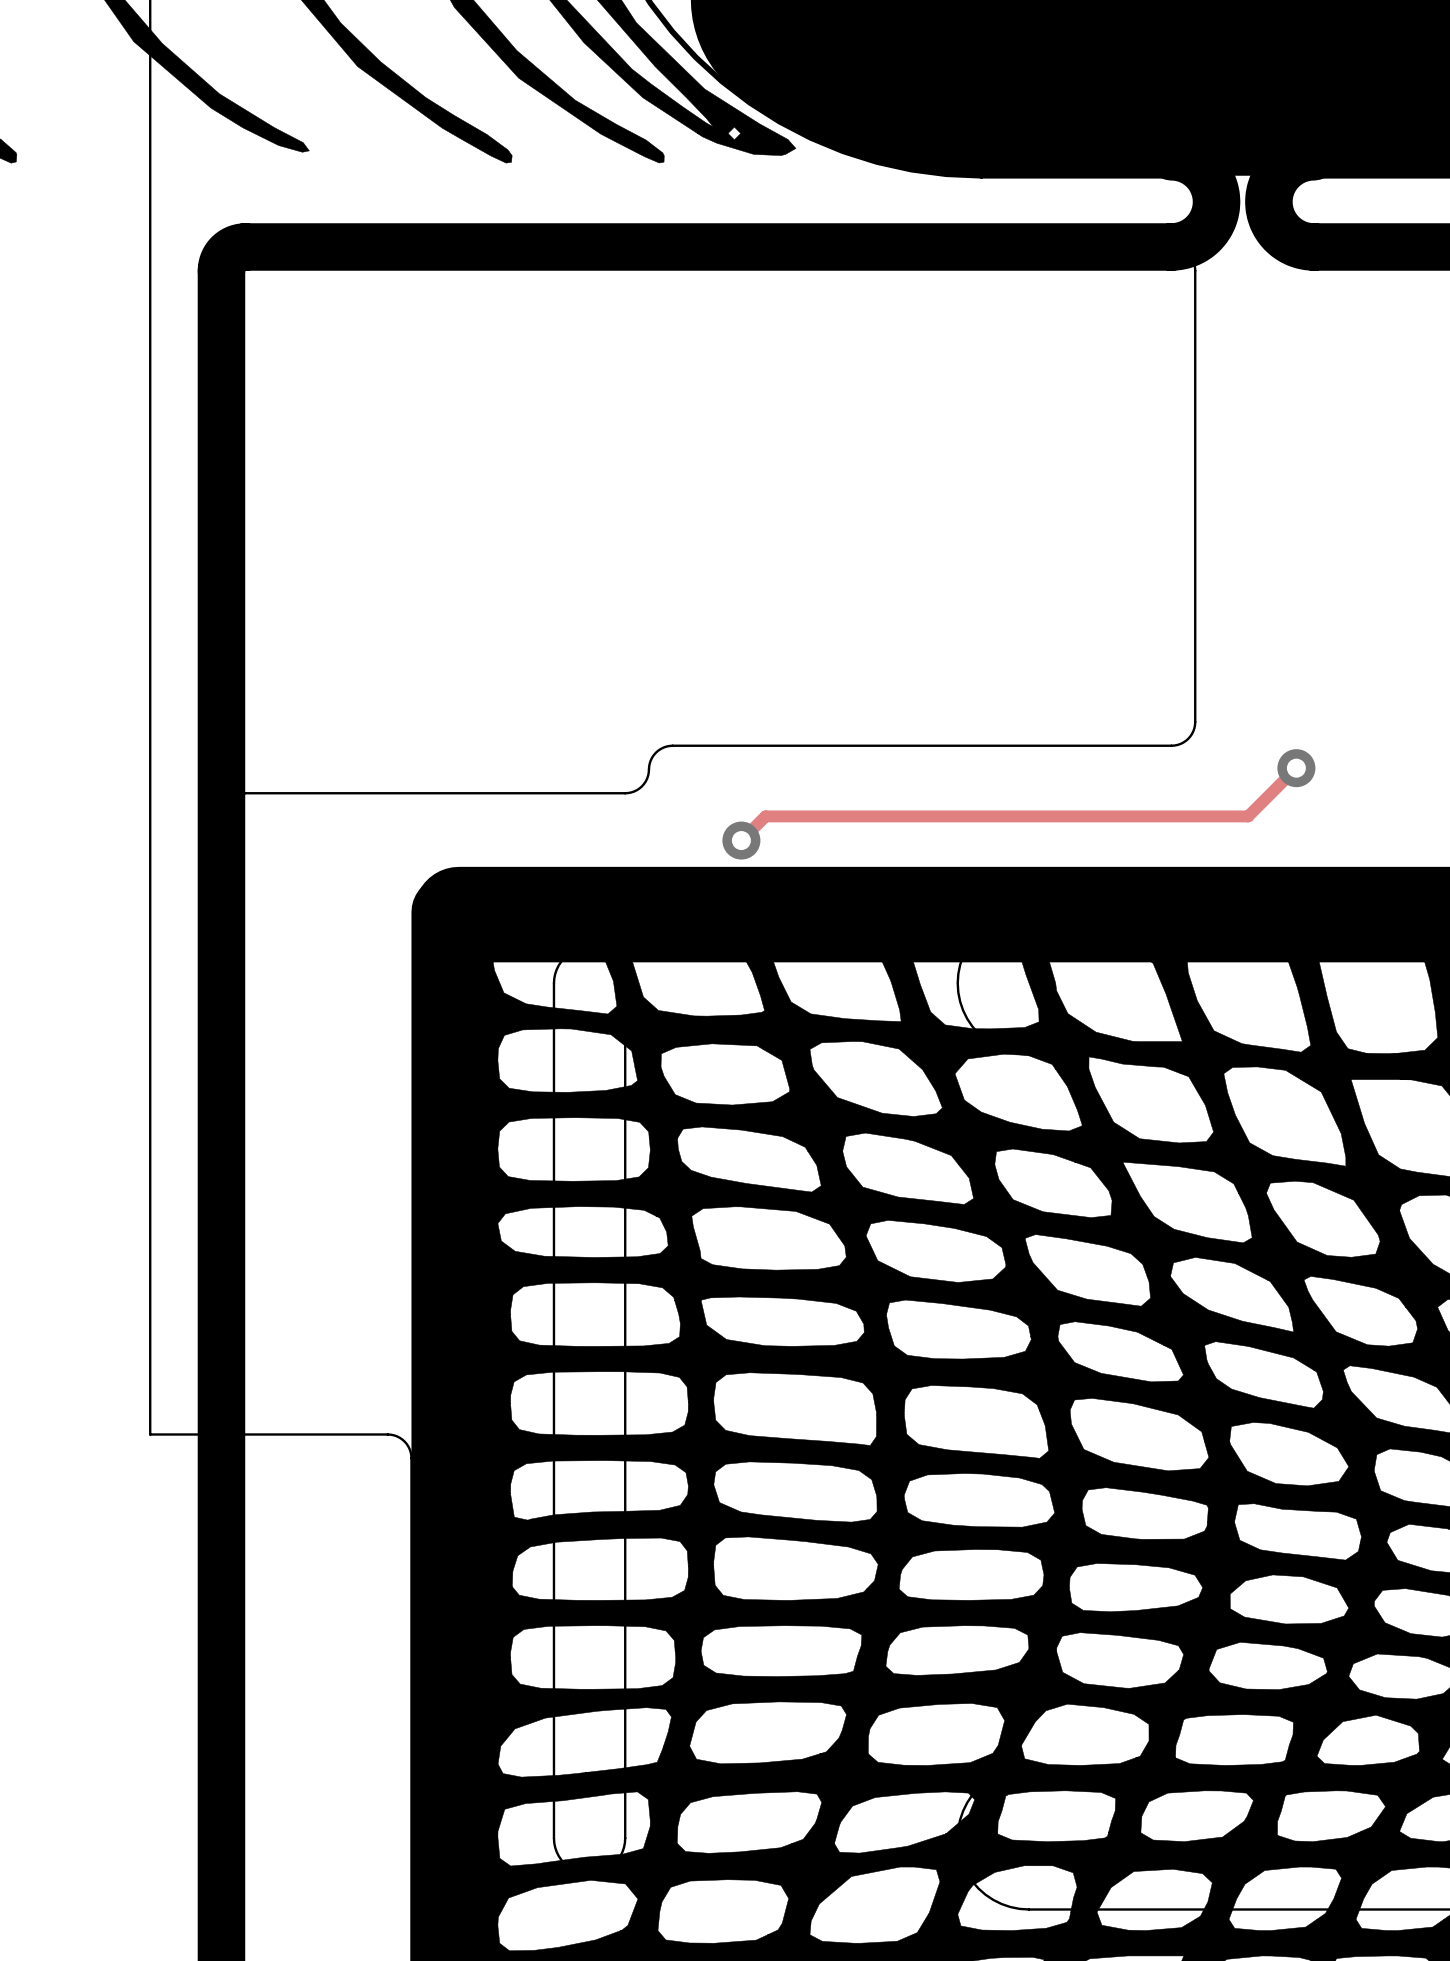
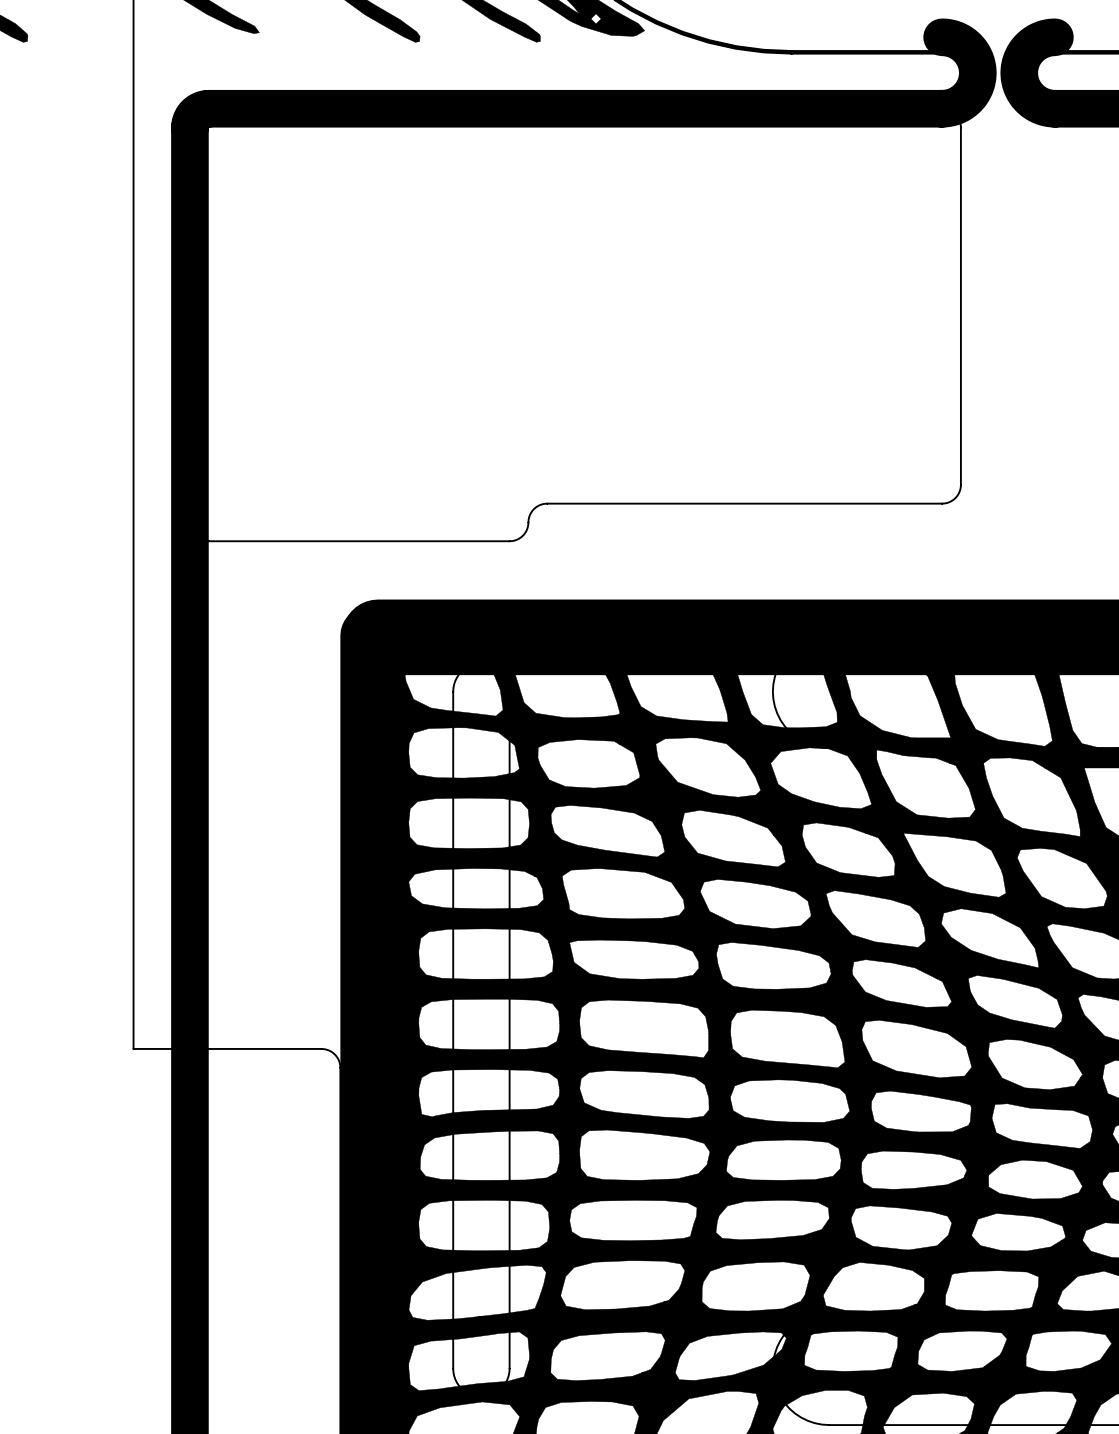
track: (1296, 768) (1248, 816) (765, 816) (741, 840) -> none
via: (1296, 768) -> none
via: (741, 840) -> none

